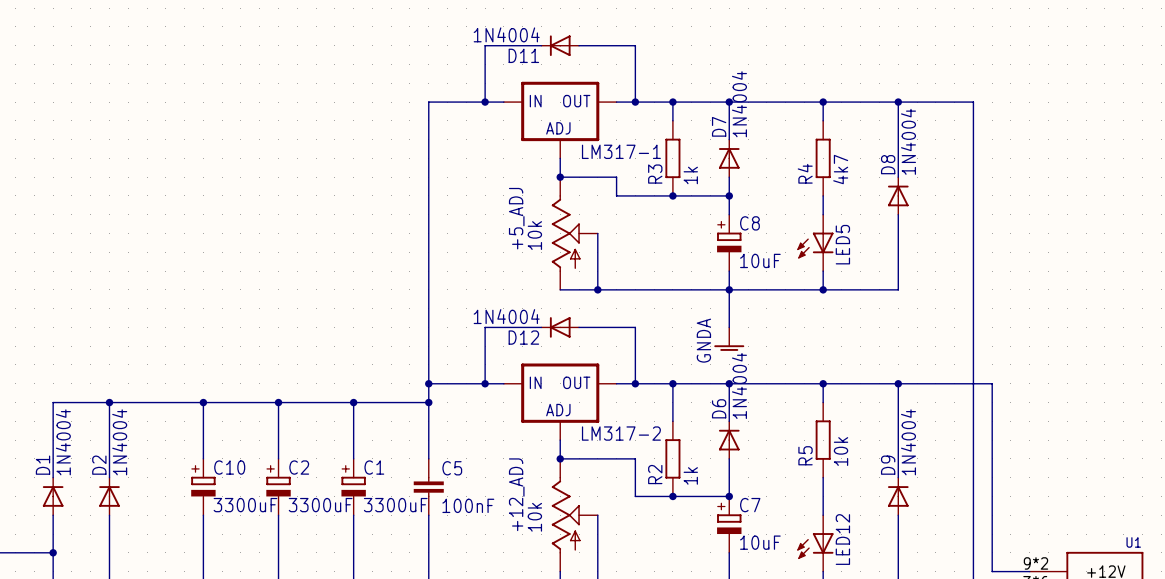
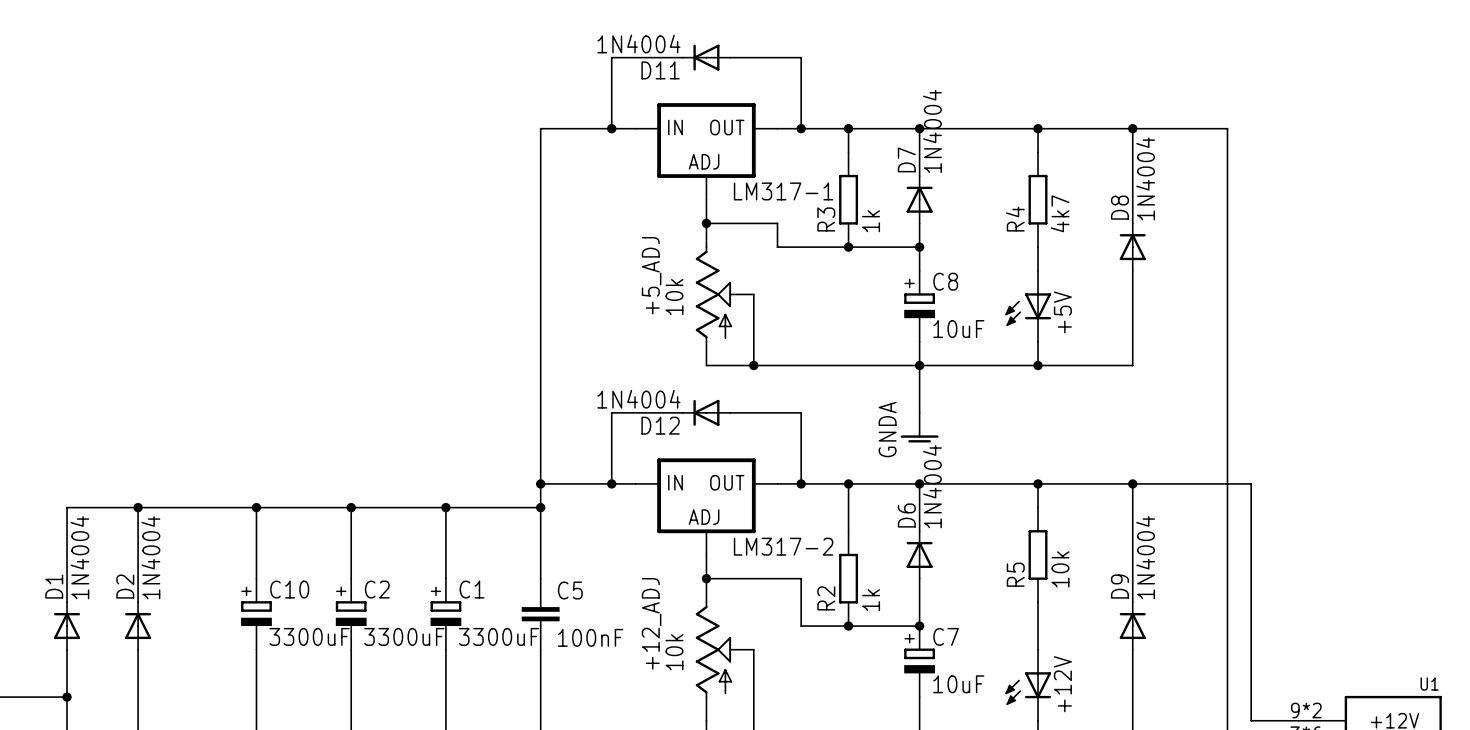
LED5 name: LED5 (842, 244) -> +5V (1062, 312)
LED12 name: LED12 (842, 539) -> +12V (1062, 684)

